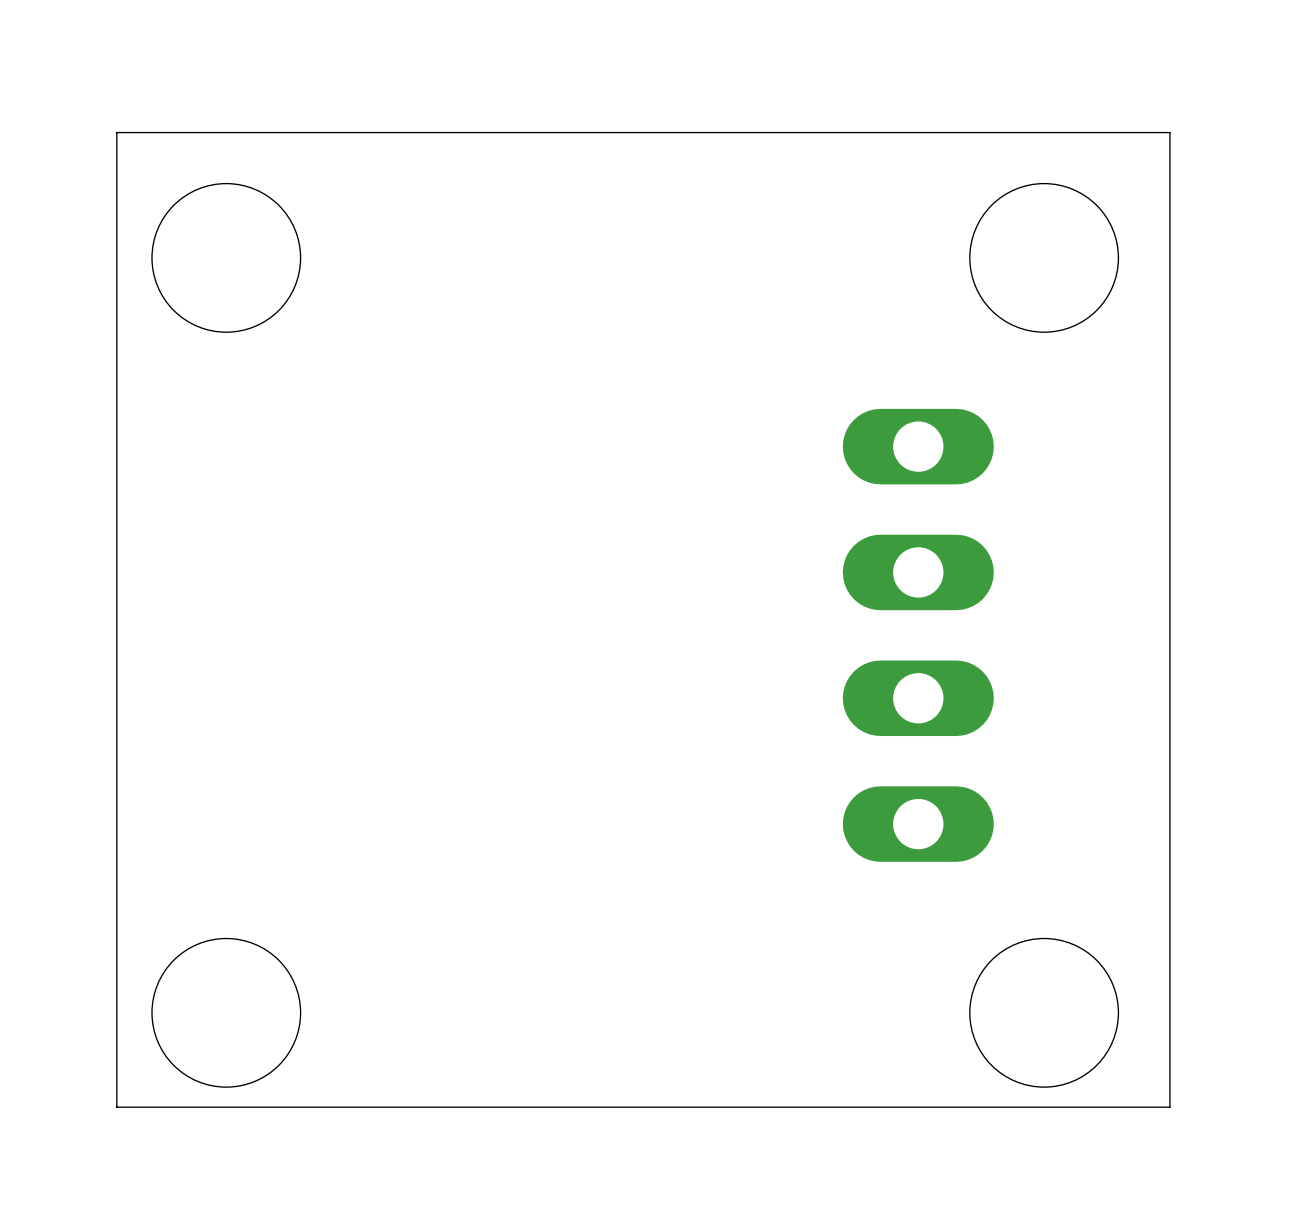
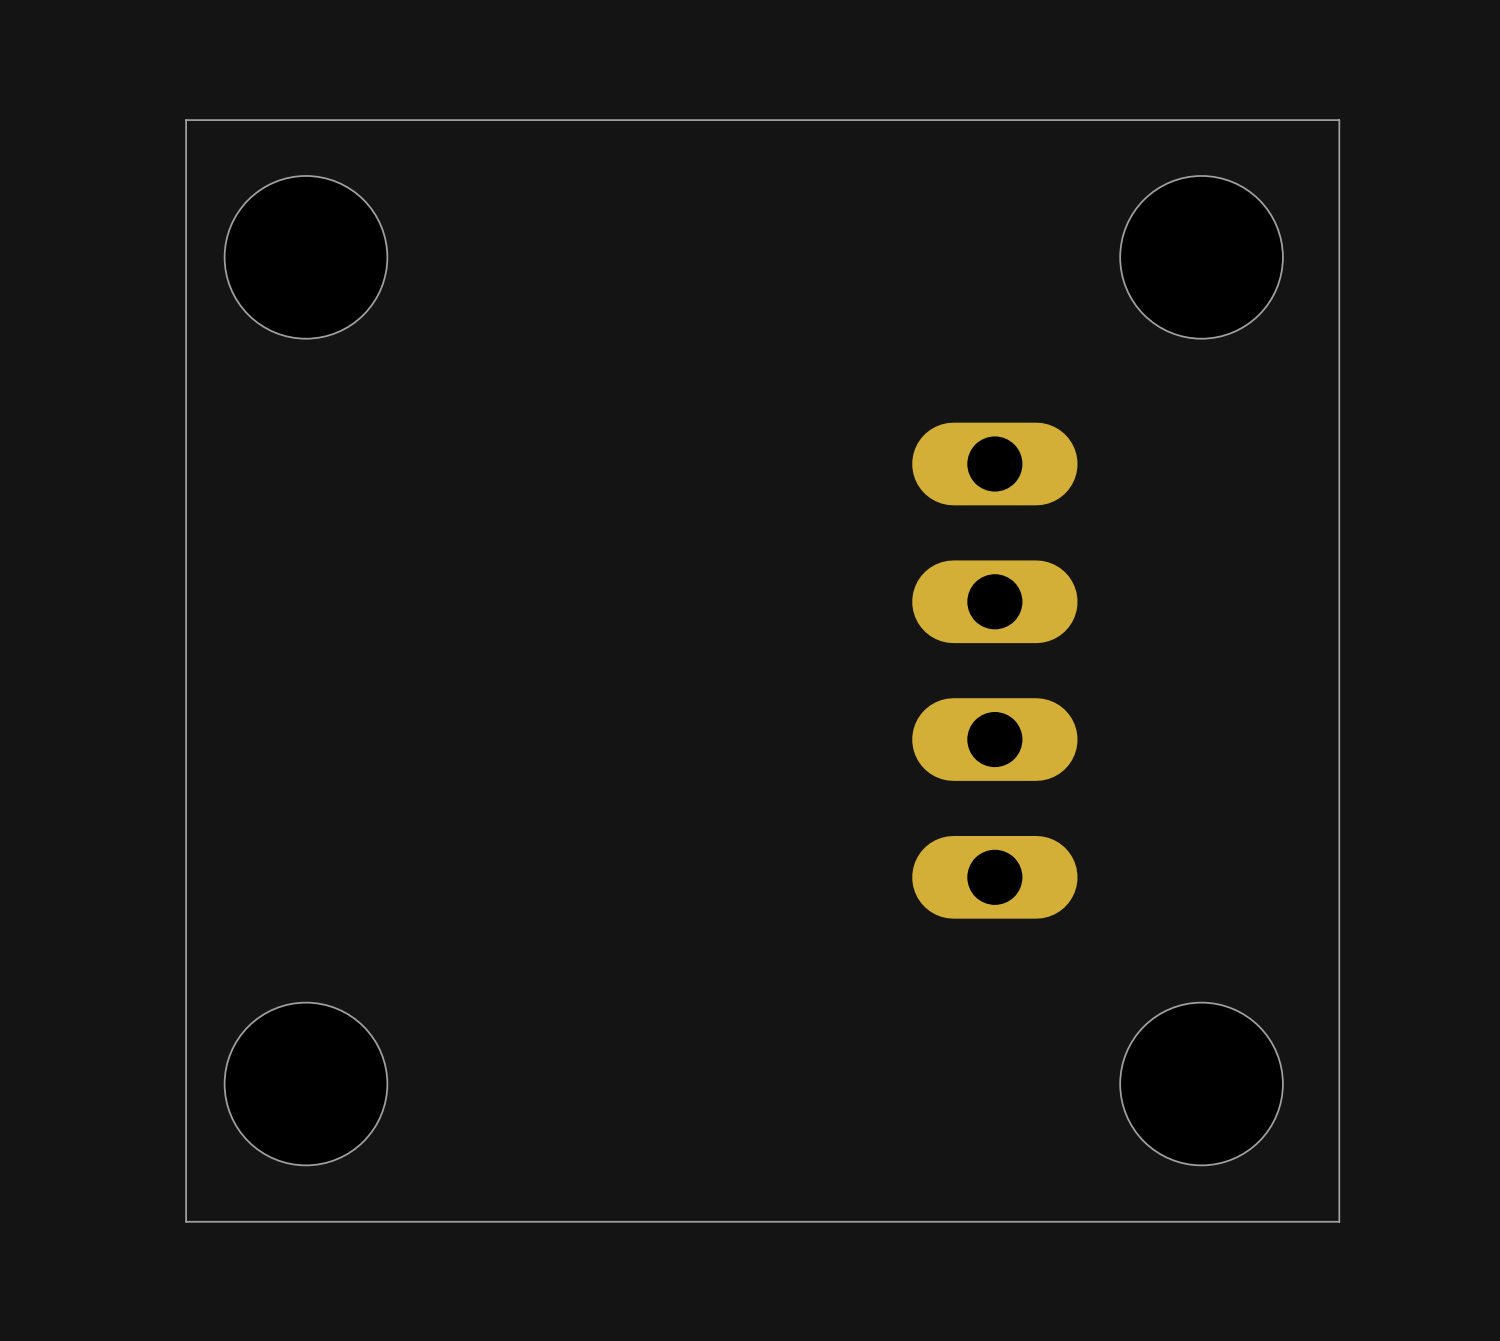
part position: (918, 635) -> (994, 670)
board edge: (1169, 1107) (116, 1107) -> (1339, 1187) (1339, 1221) (186, 1221) (186, 1187)

